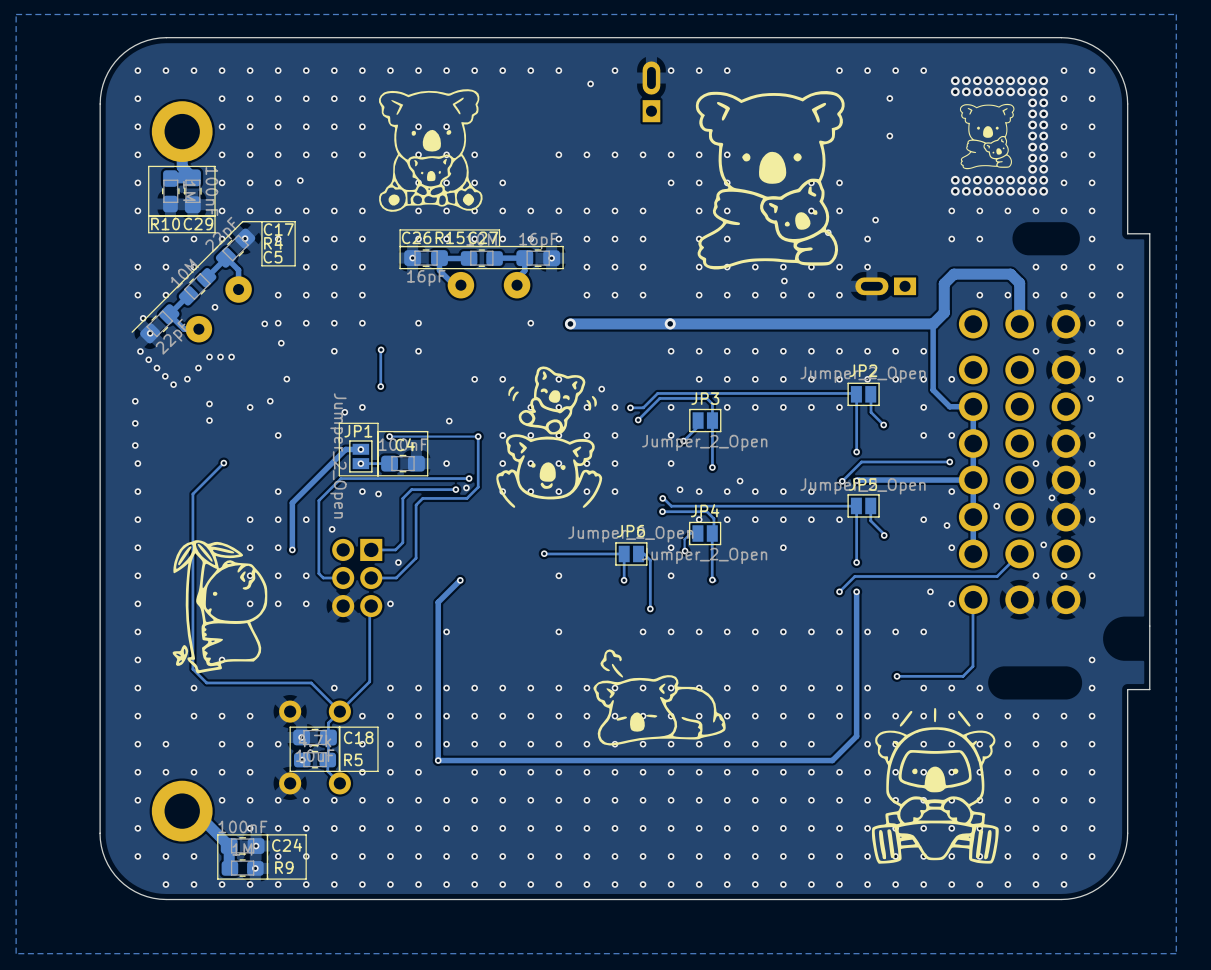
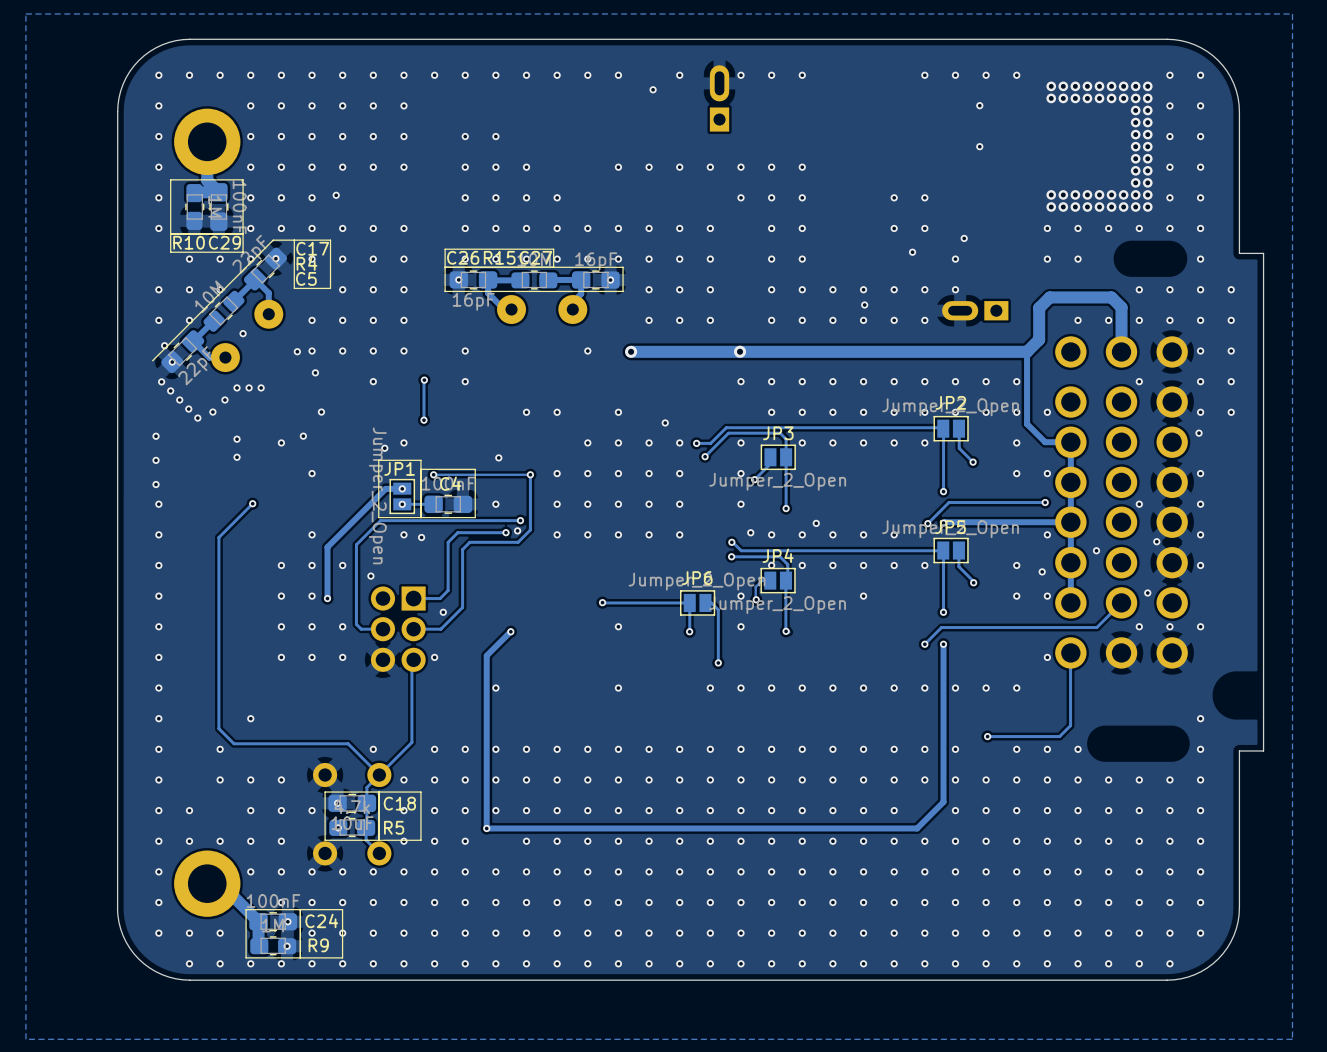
drawing: [379, 89, 483, 212] -> none
drawing: [695, 91, 845, 270] -> none
drawing: [959, 103, 1015, 170] -> none
drawing: [496, 366, 603, 508] -> none
drawing: [172, 540, 268, 674] -> none
via position: (930, 591) -> (1016, 596)
drawing: [593, 649, 726, 746] -> none
drawing: [871, 708, 999, 864] -> none

